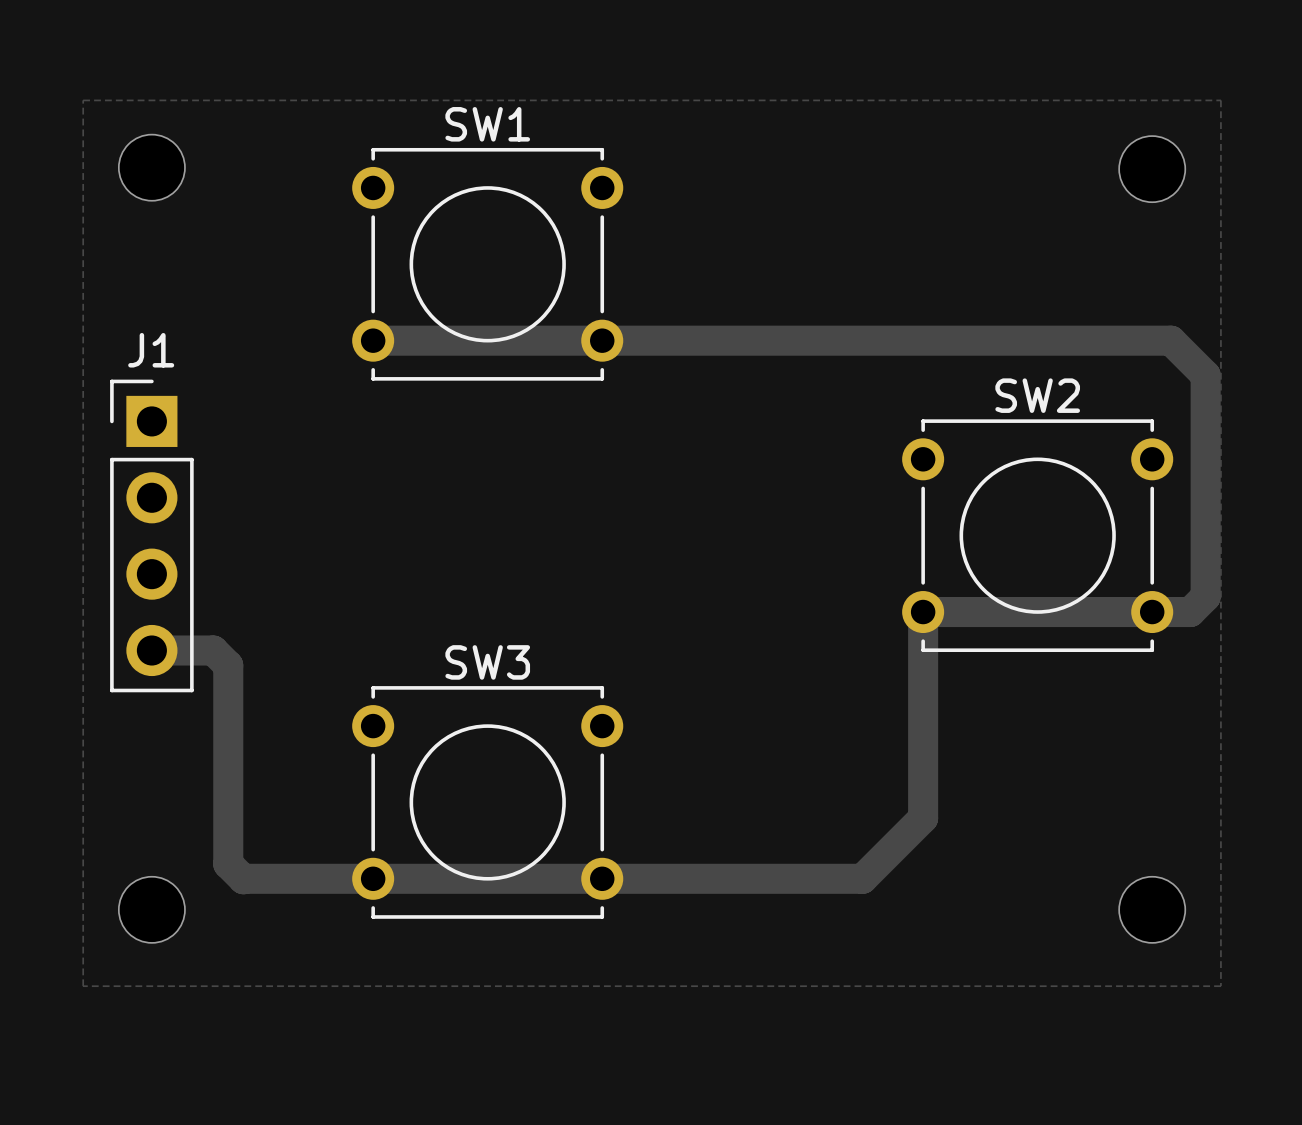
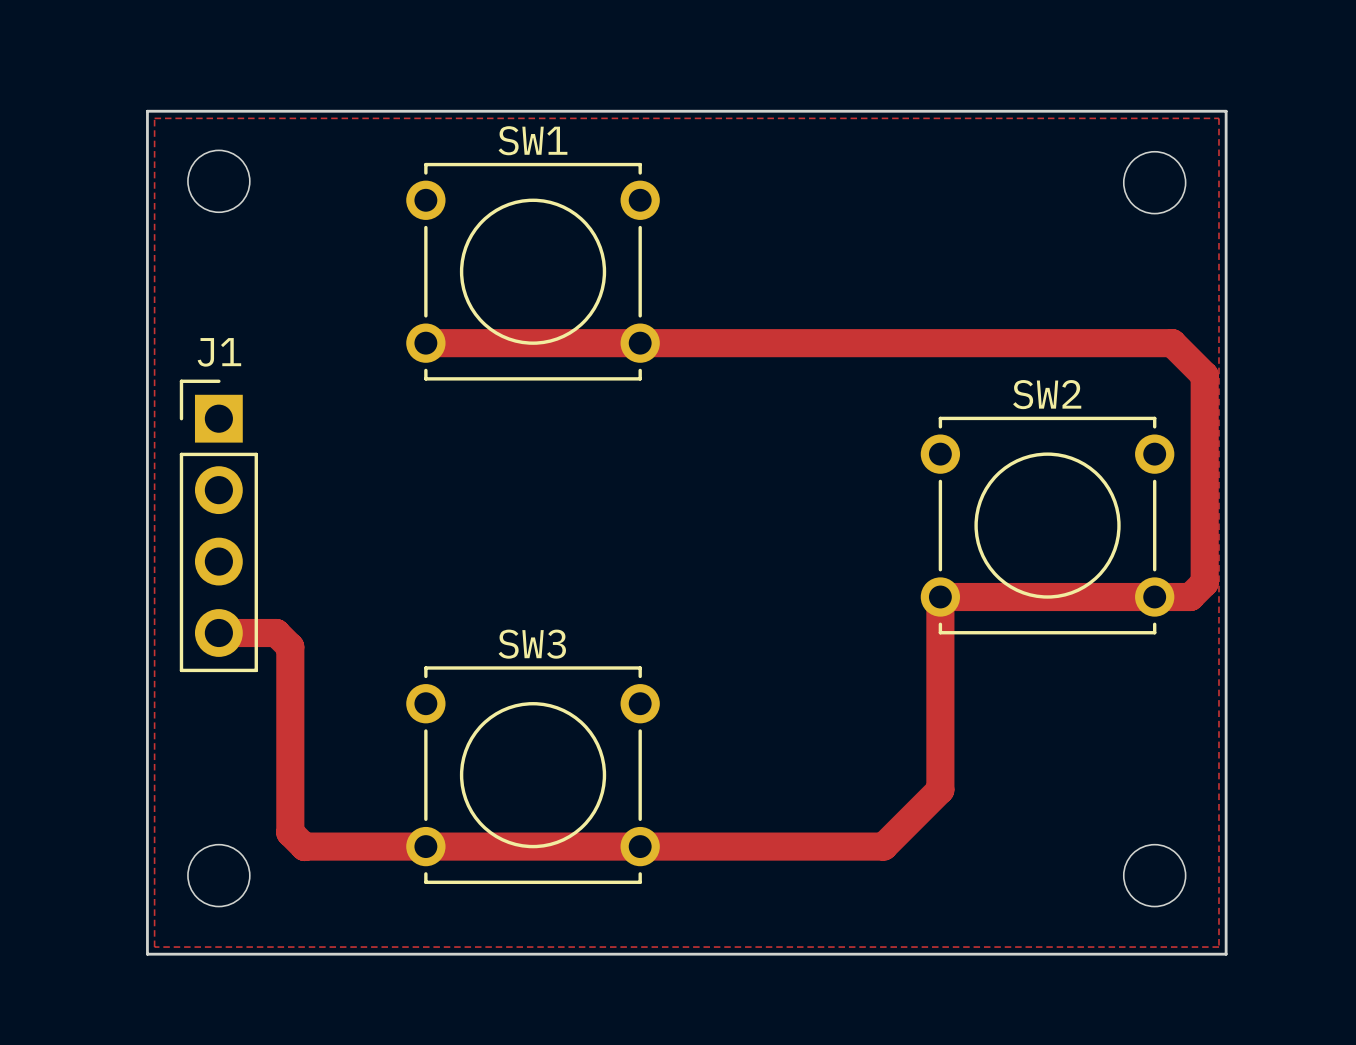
board edge: none -> (147, 111) (1226, 111) (1226, 954) (147, 954) (147, 111)

